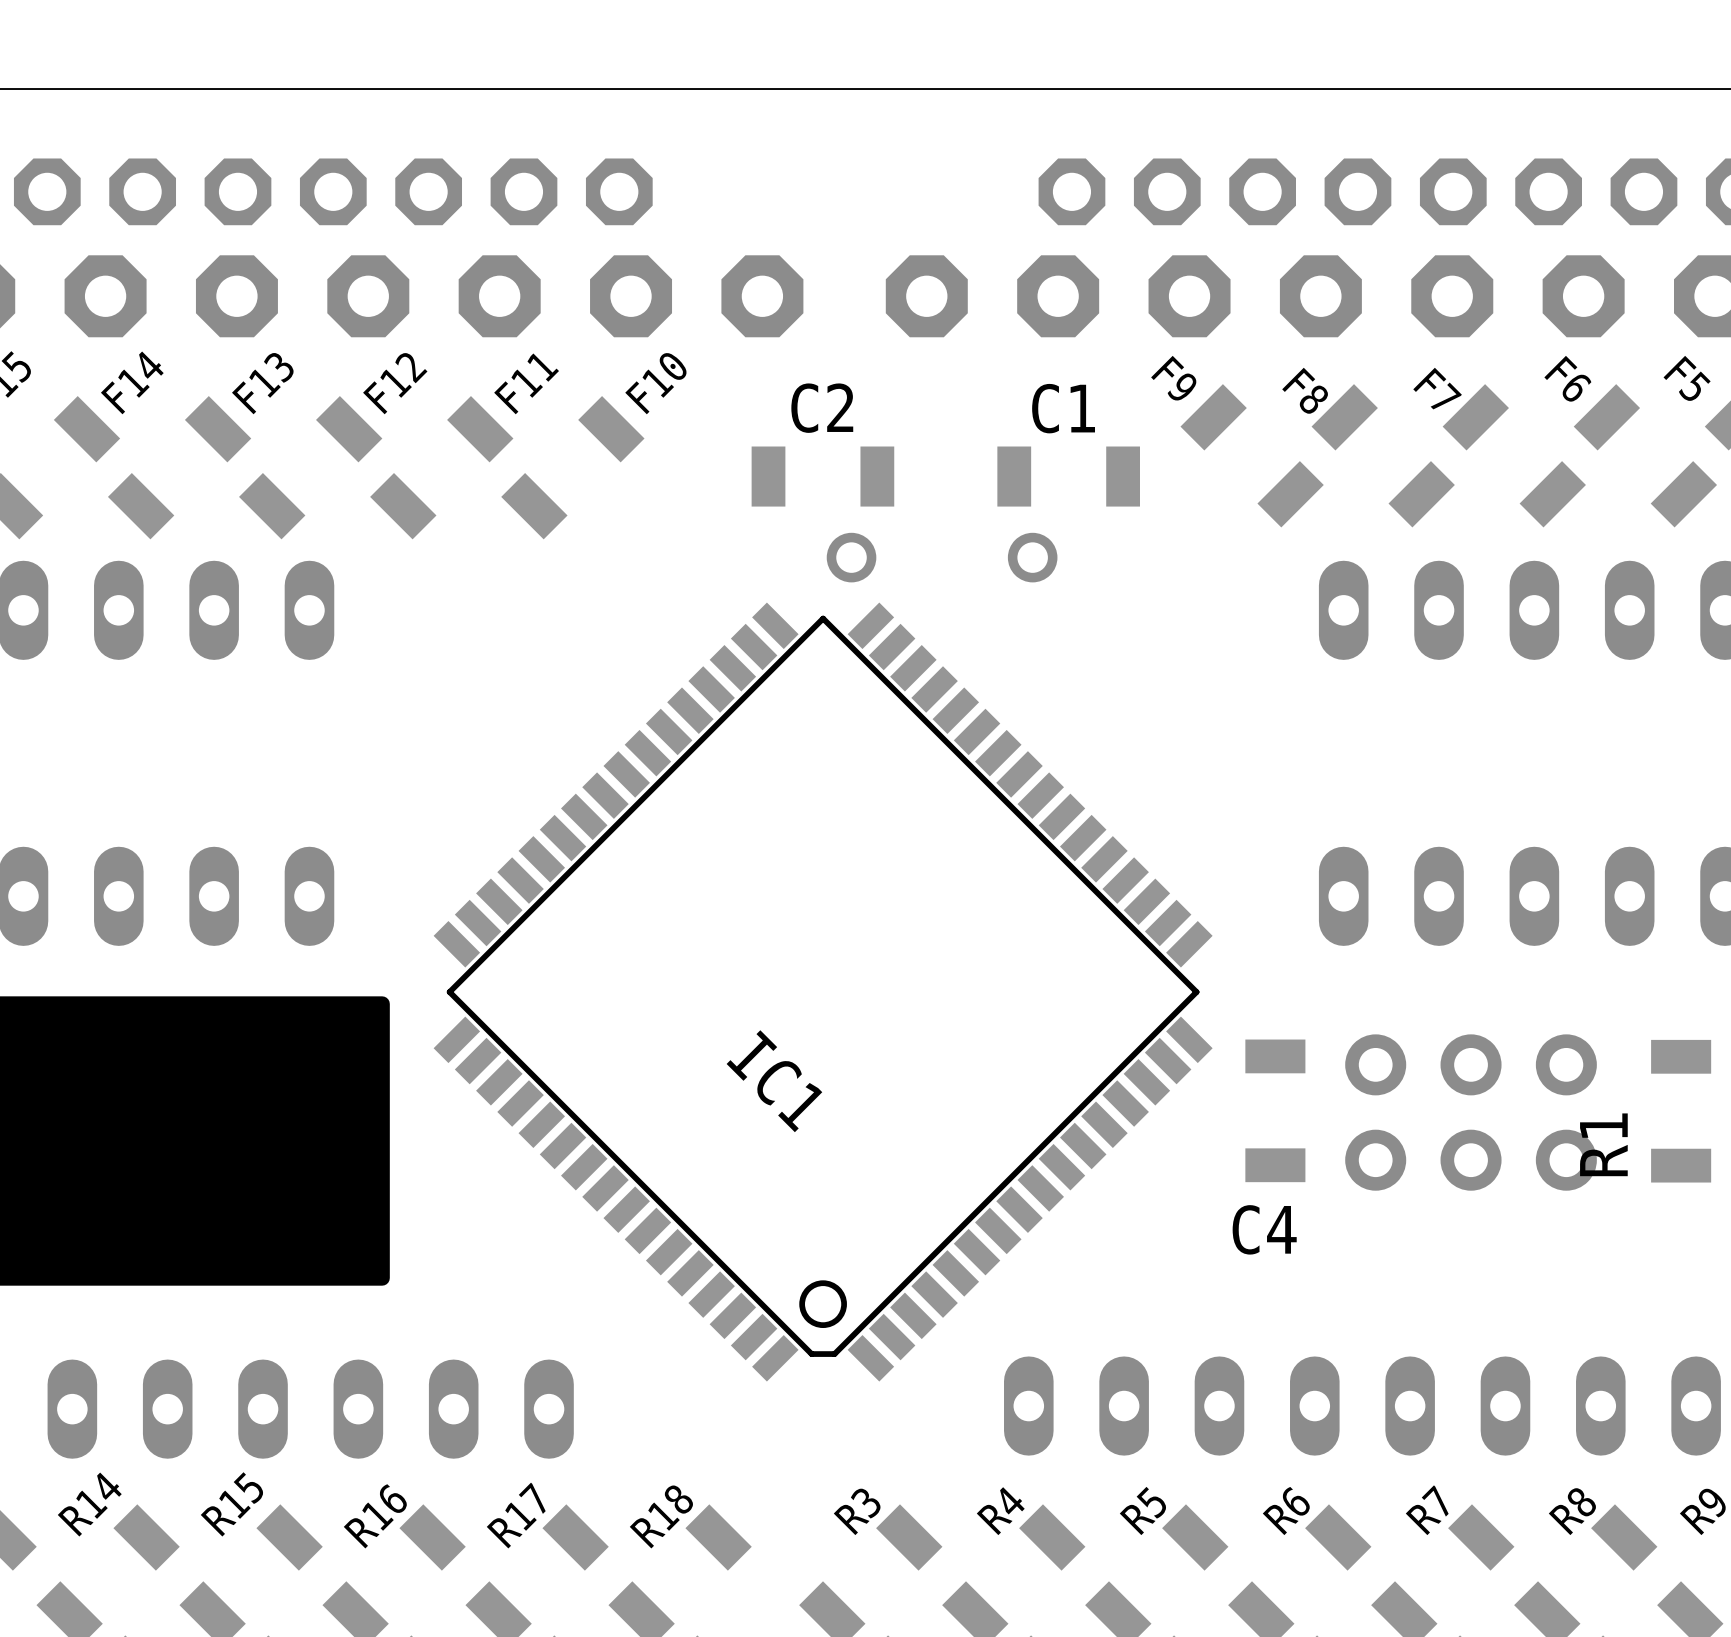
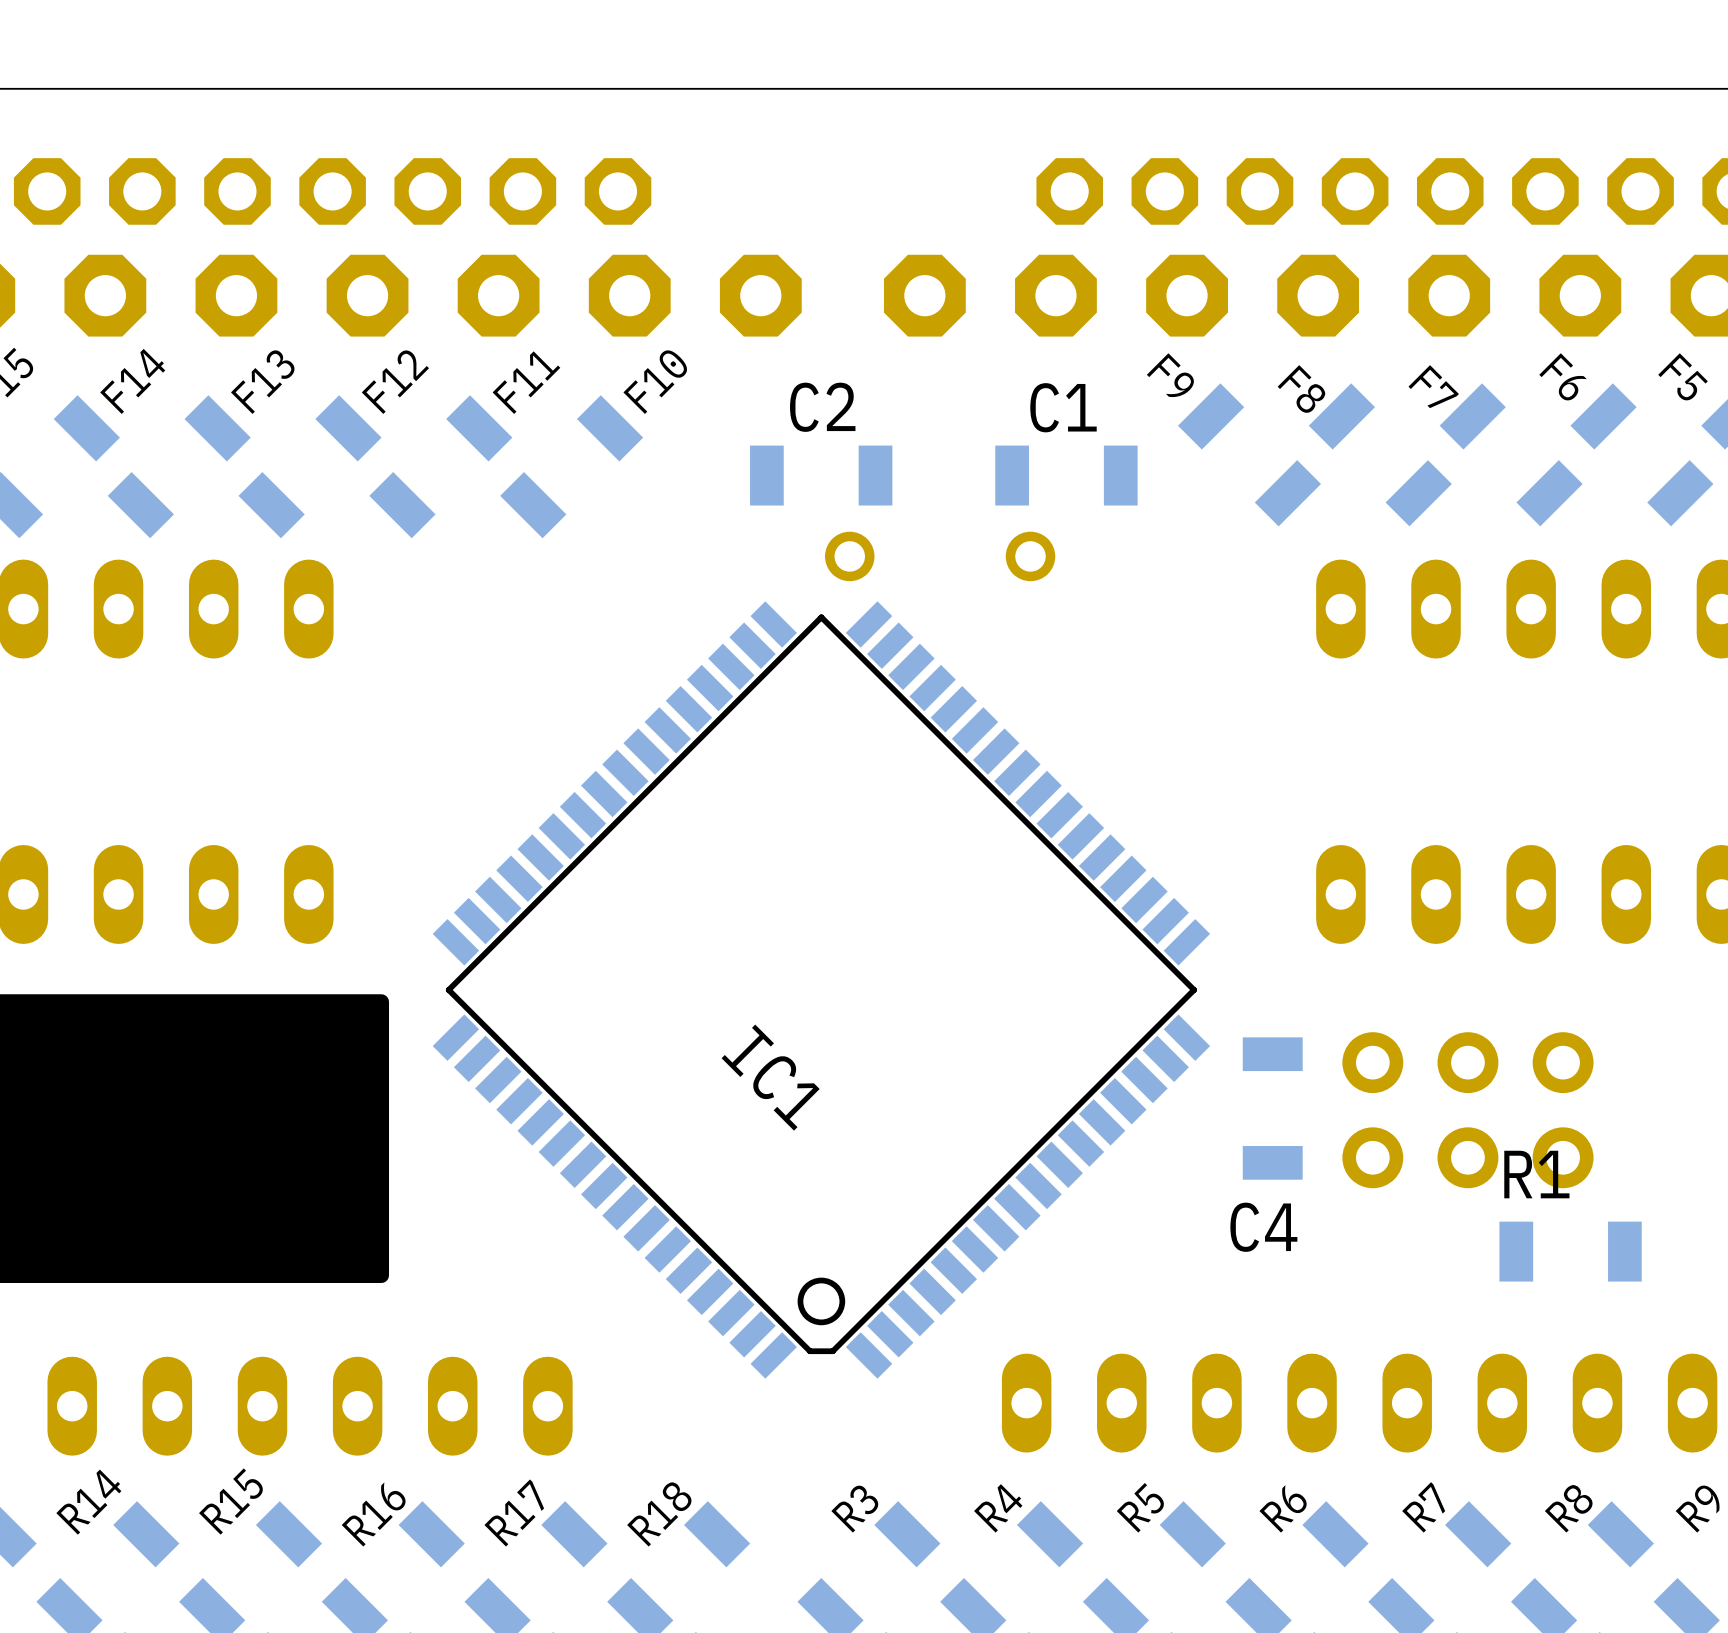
R1 rotation: 0° (1681, 1111) -> 90° clockwise (1570, 1251)
R1 position: (1681, 1111) -> (1570, 1251)

